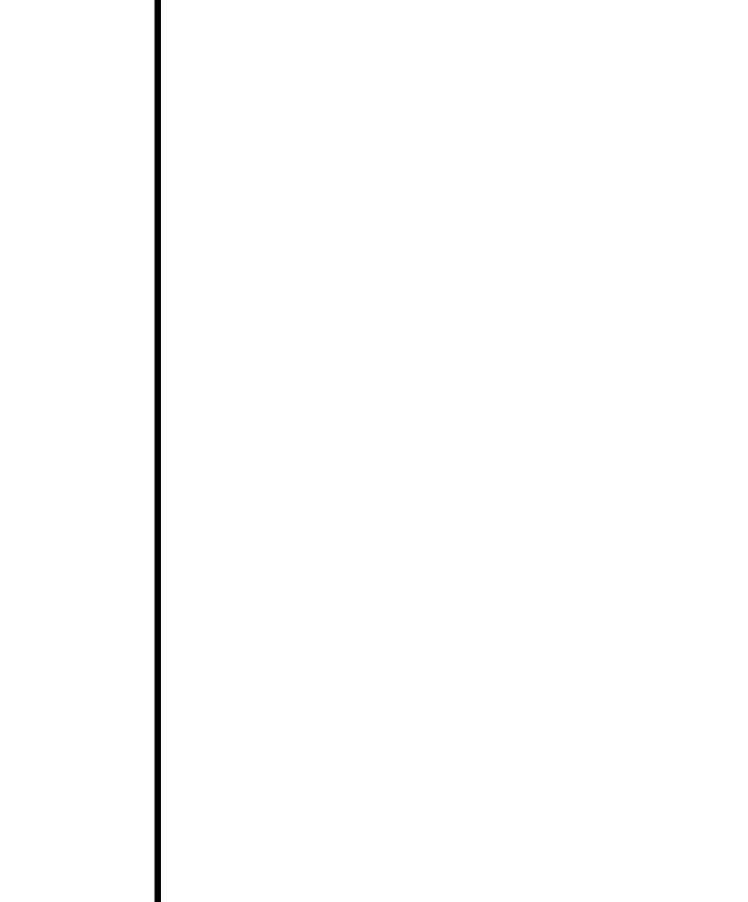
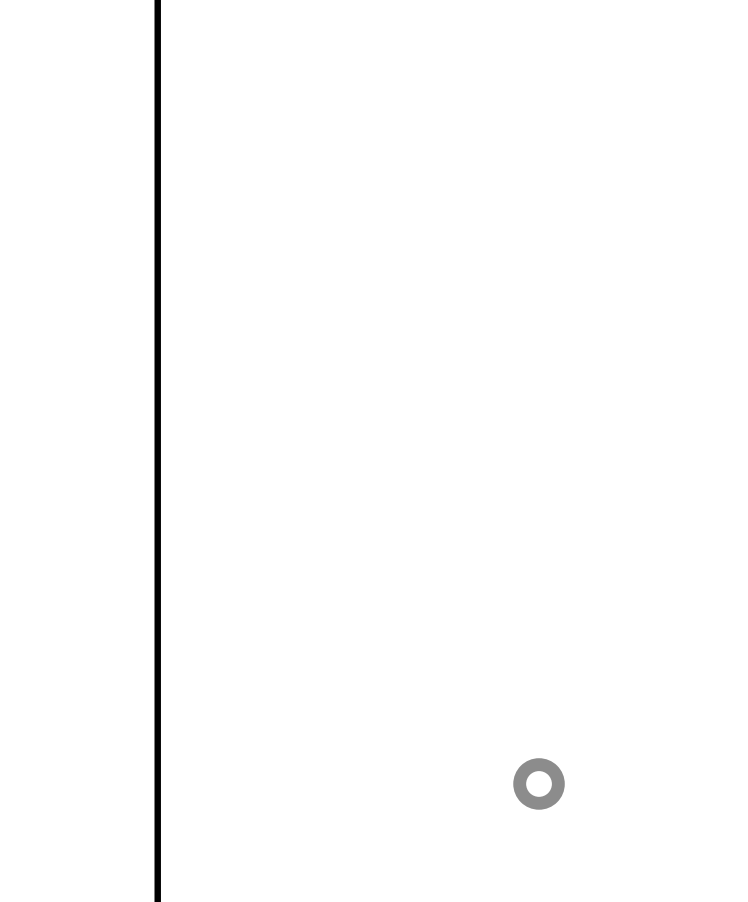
via: none -> (539, 783)

